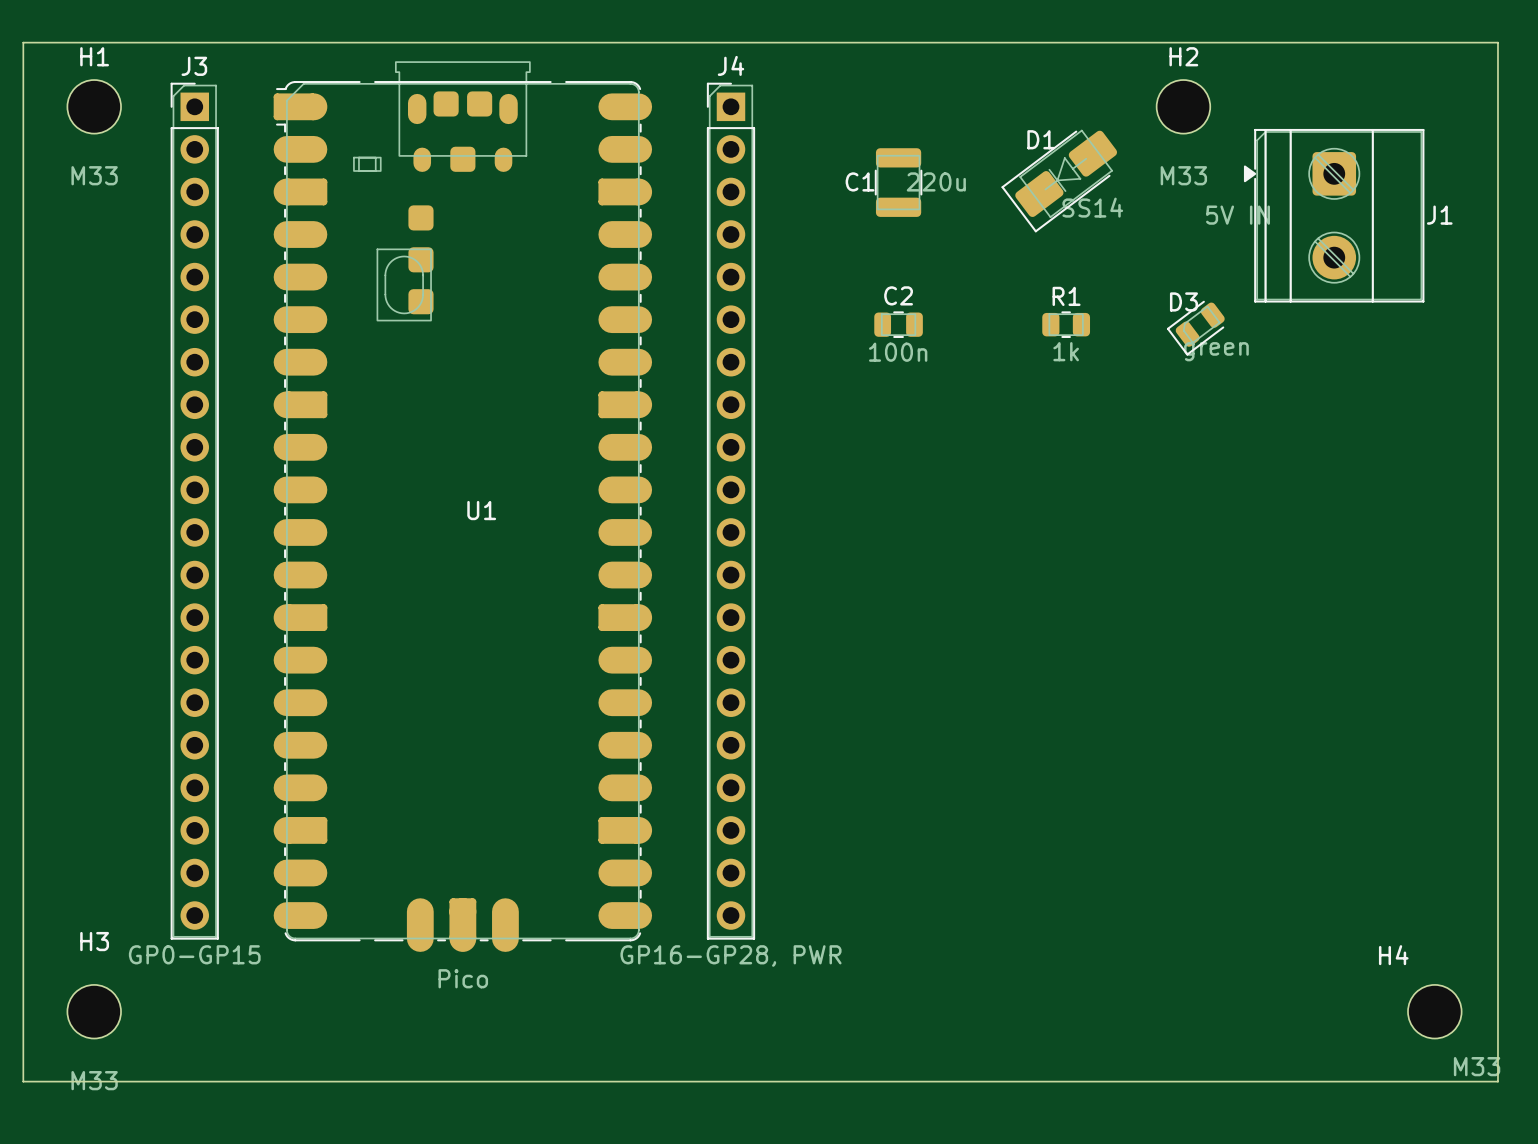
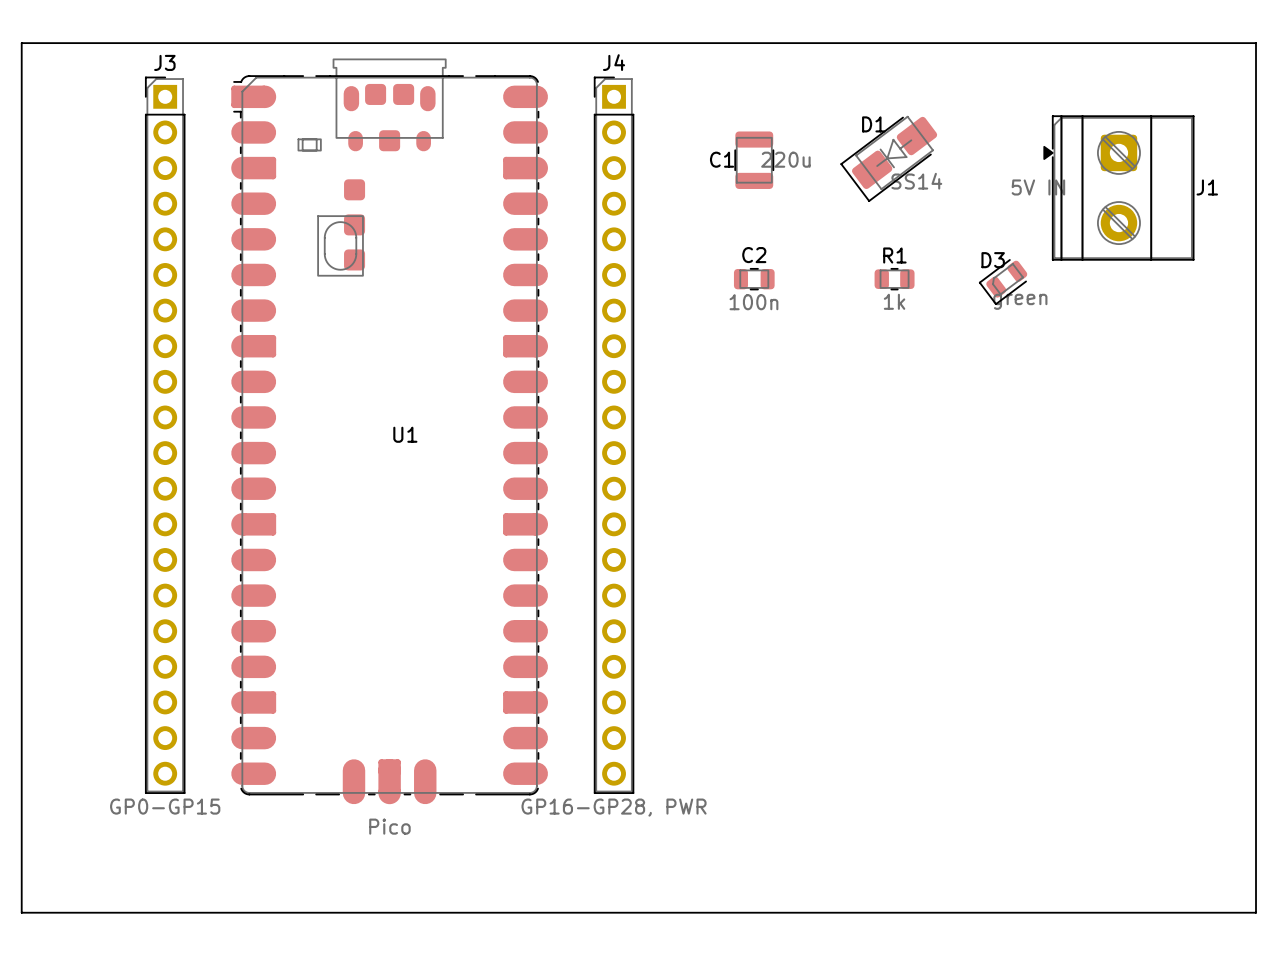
H1: M33 (94, 106) -> none
H2: M33 (1183, 106) -> none
H3: M33 (94, 1011) -> none
H4: M33 (1434, 1011) -> none

